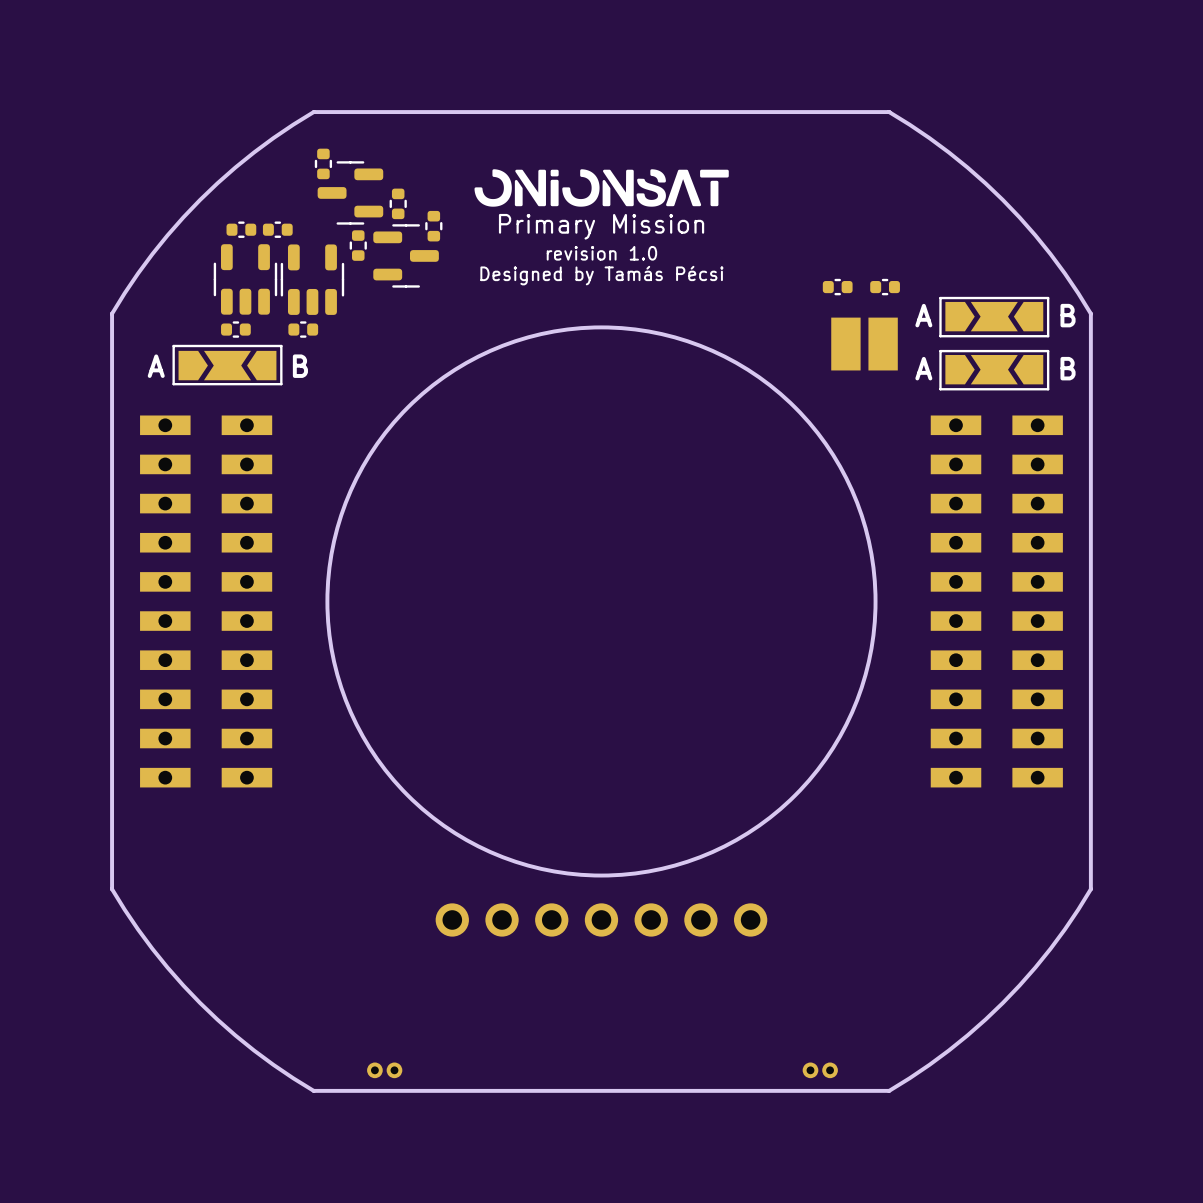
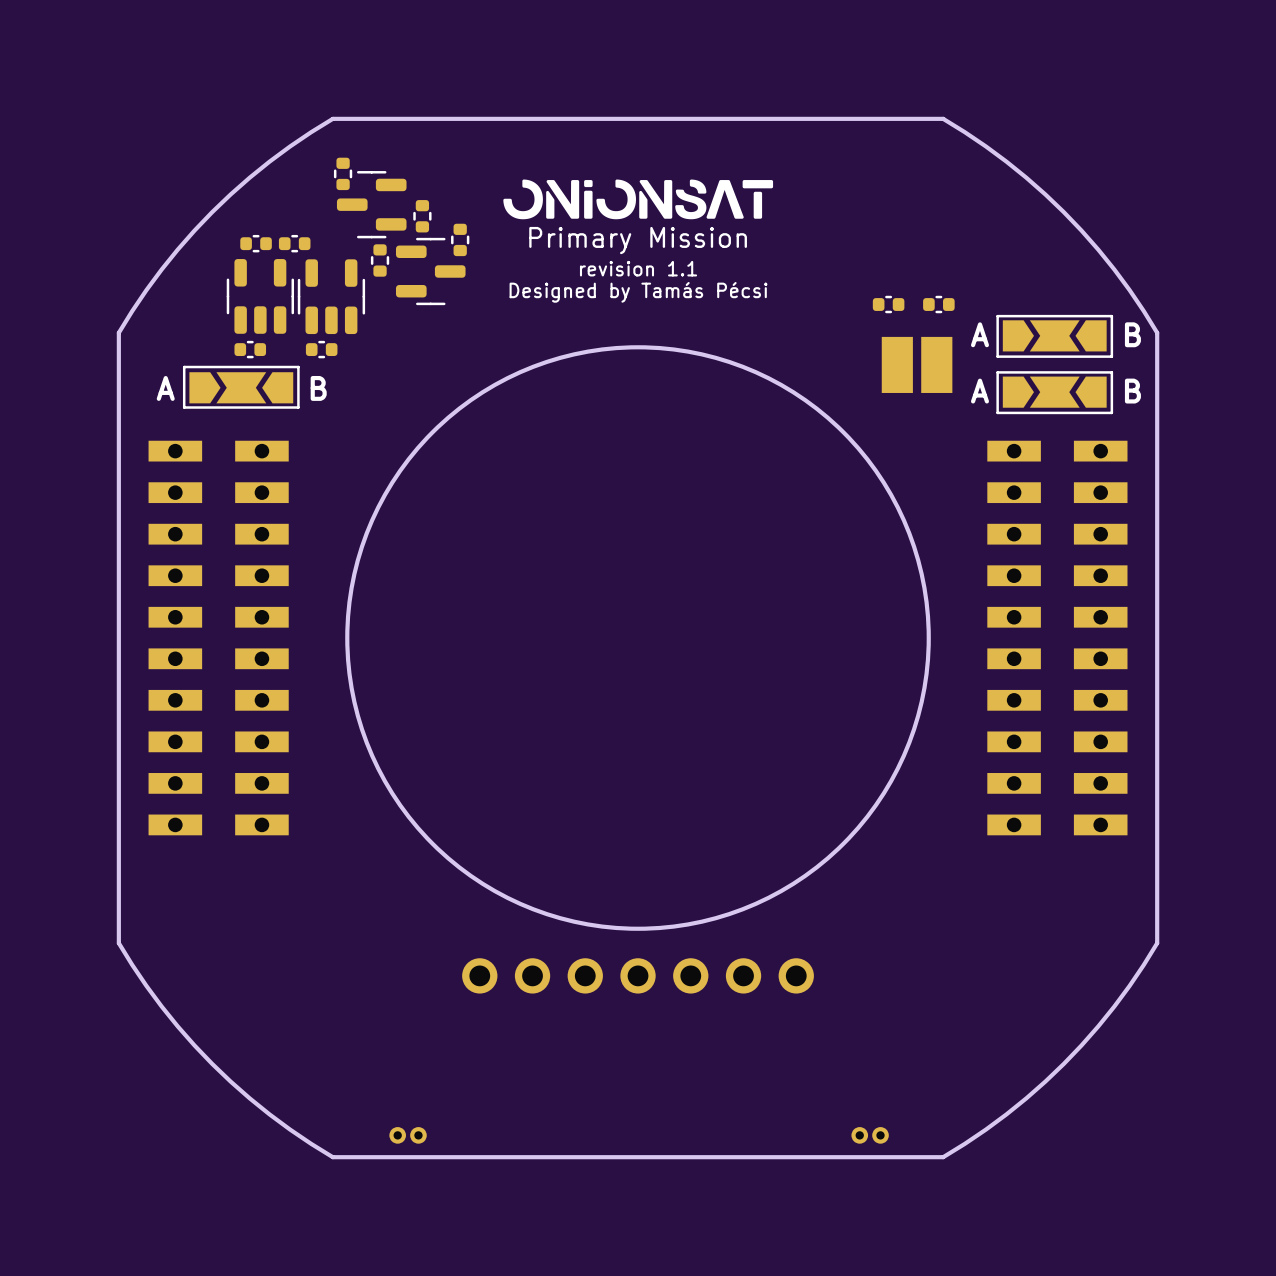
text: revision 1.0 (601, 253) -> revision 1.1 (638, 268)

